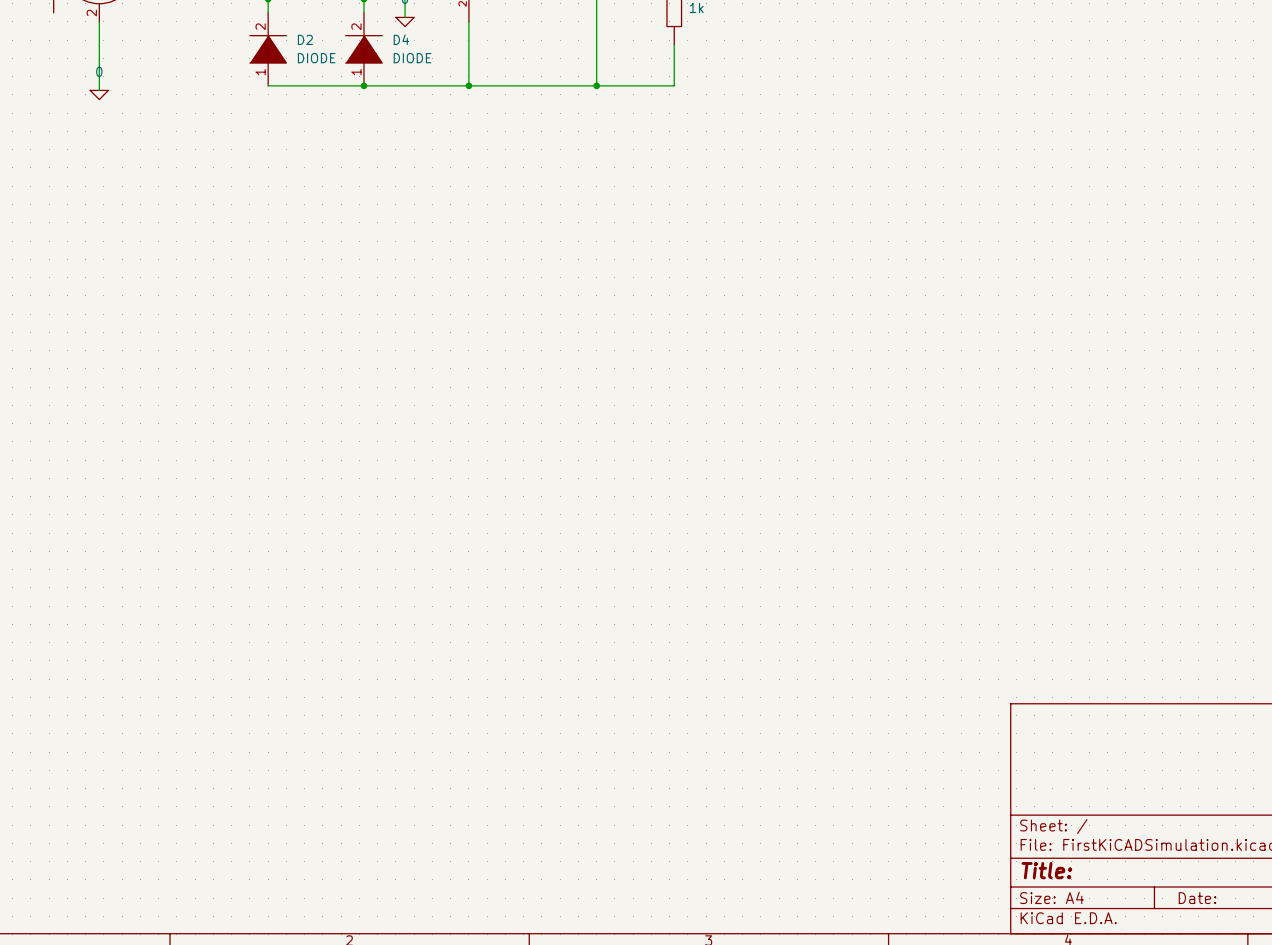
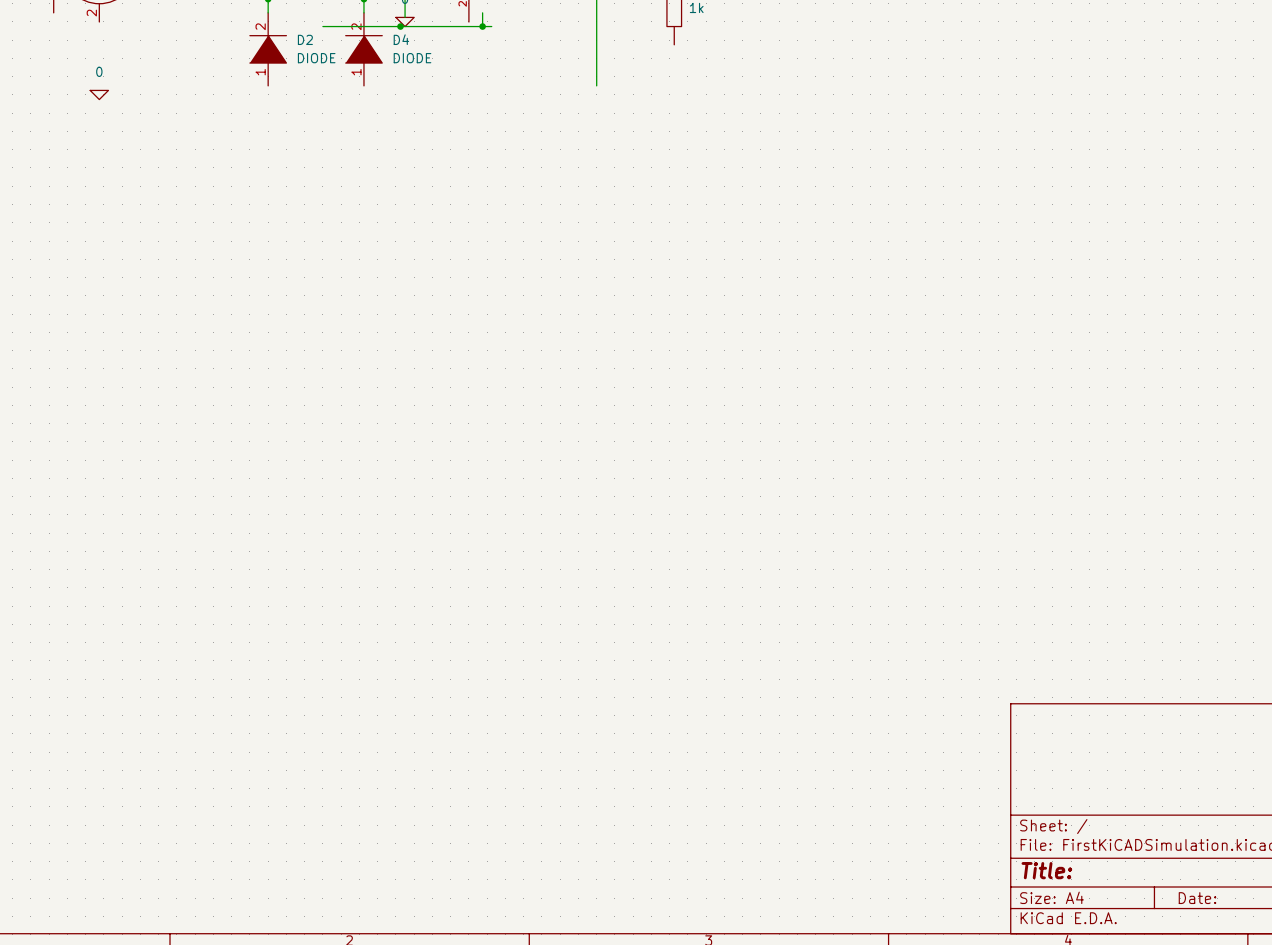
wire: none -> (482, 12) (482, 26)
wire: (99, 21) (99, 90) -> none
wire: (468, 21) (468, 85) -> none
wire: none -> (322, 26) (491, 26)
junction: none -> (400, 26)
junction: none -> (482, 26)
wire: (674, 44) (674, 85) (268, 85) -> none
junction: (363, 85) -> none
junction: (468, 85) -> none
junction: (596, 85) -> none

